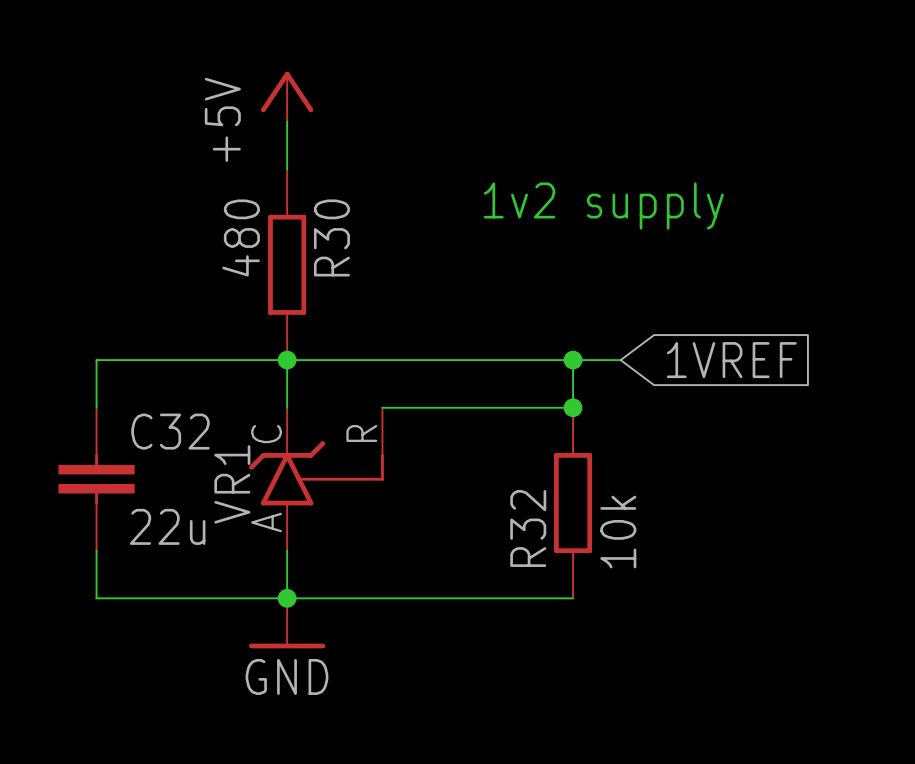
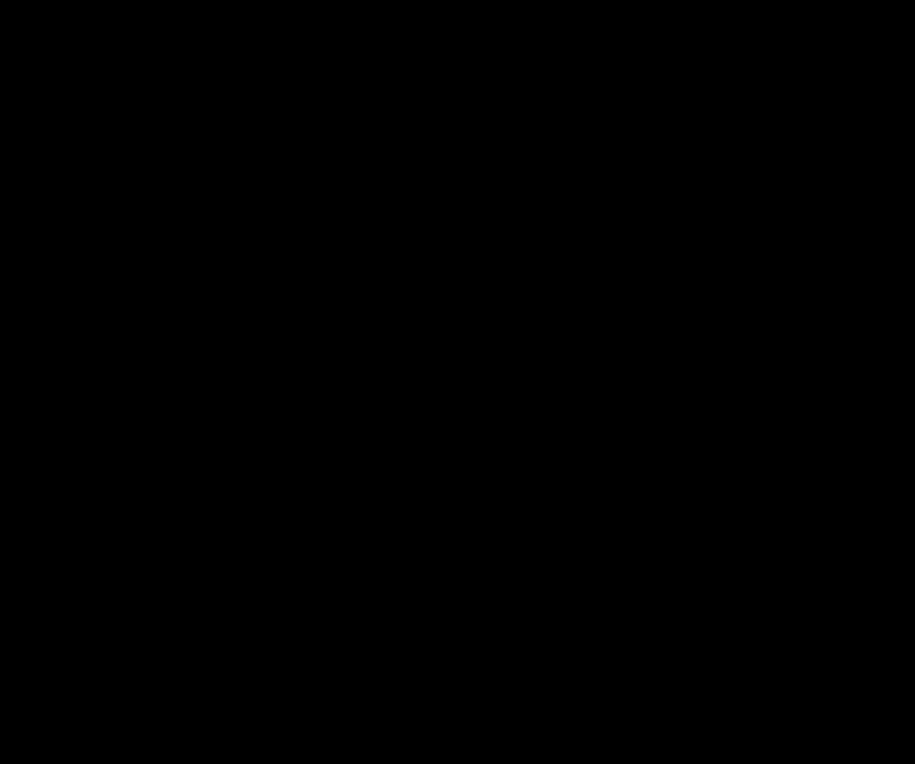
power symbol: +5V (287, 96) -> none
wire: (287, 121) (287, 169) -> none
text: 1v2 supply (603, 206) -> none
R30: 480 (287, 264) -> none
wire: (287, 360) (287, 407) -> none
junction: (287, 360) -> none
wire: (573, 360) (573, 407) (382, 407) -> none
junction: (573, 360) -> none
wire: (620, 360) (96, 360) (96, 407) -> none
global label: 1VREF (731, 360) -> none
junction: (573, 407) -> none
C32: 22u (96, 479) -> none
VR1: (316, 479) -> none
R32: 10k (573, 503) -> none
wire: (96, 550) (96, 598) (573, 598) -> none
wire: (287, 550) (287, 598) -> none
junction: (287, 598) -> none
power symbol: GND (287, 623) -> none

